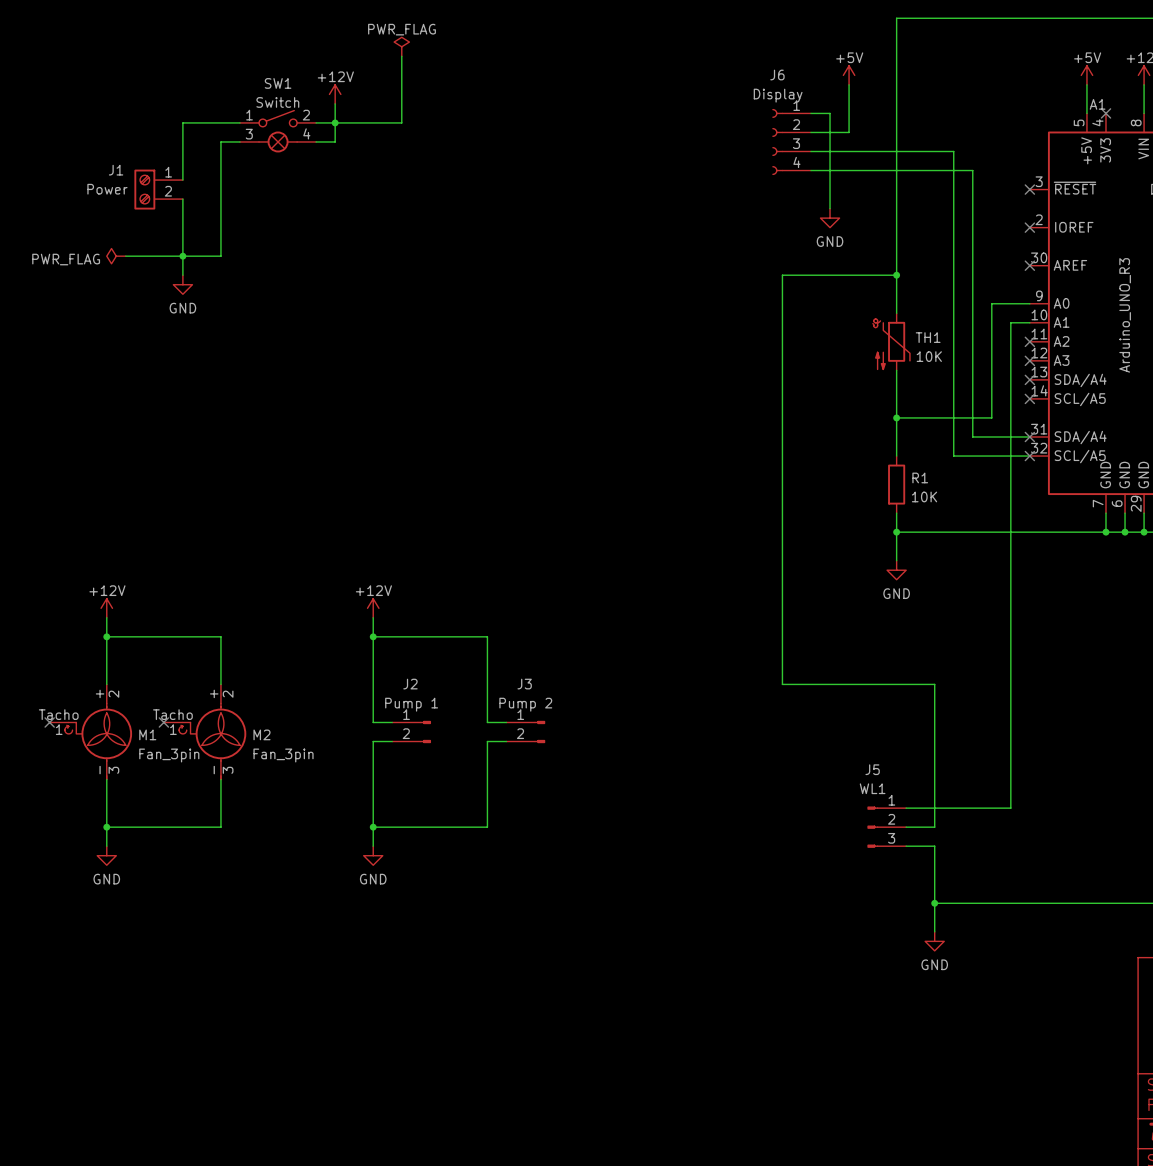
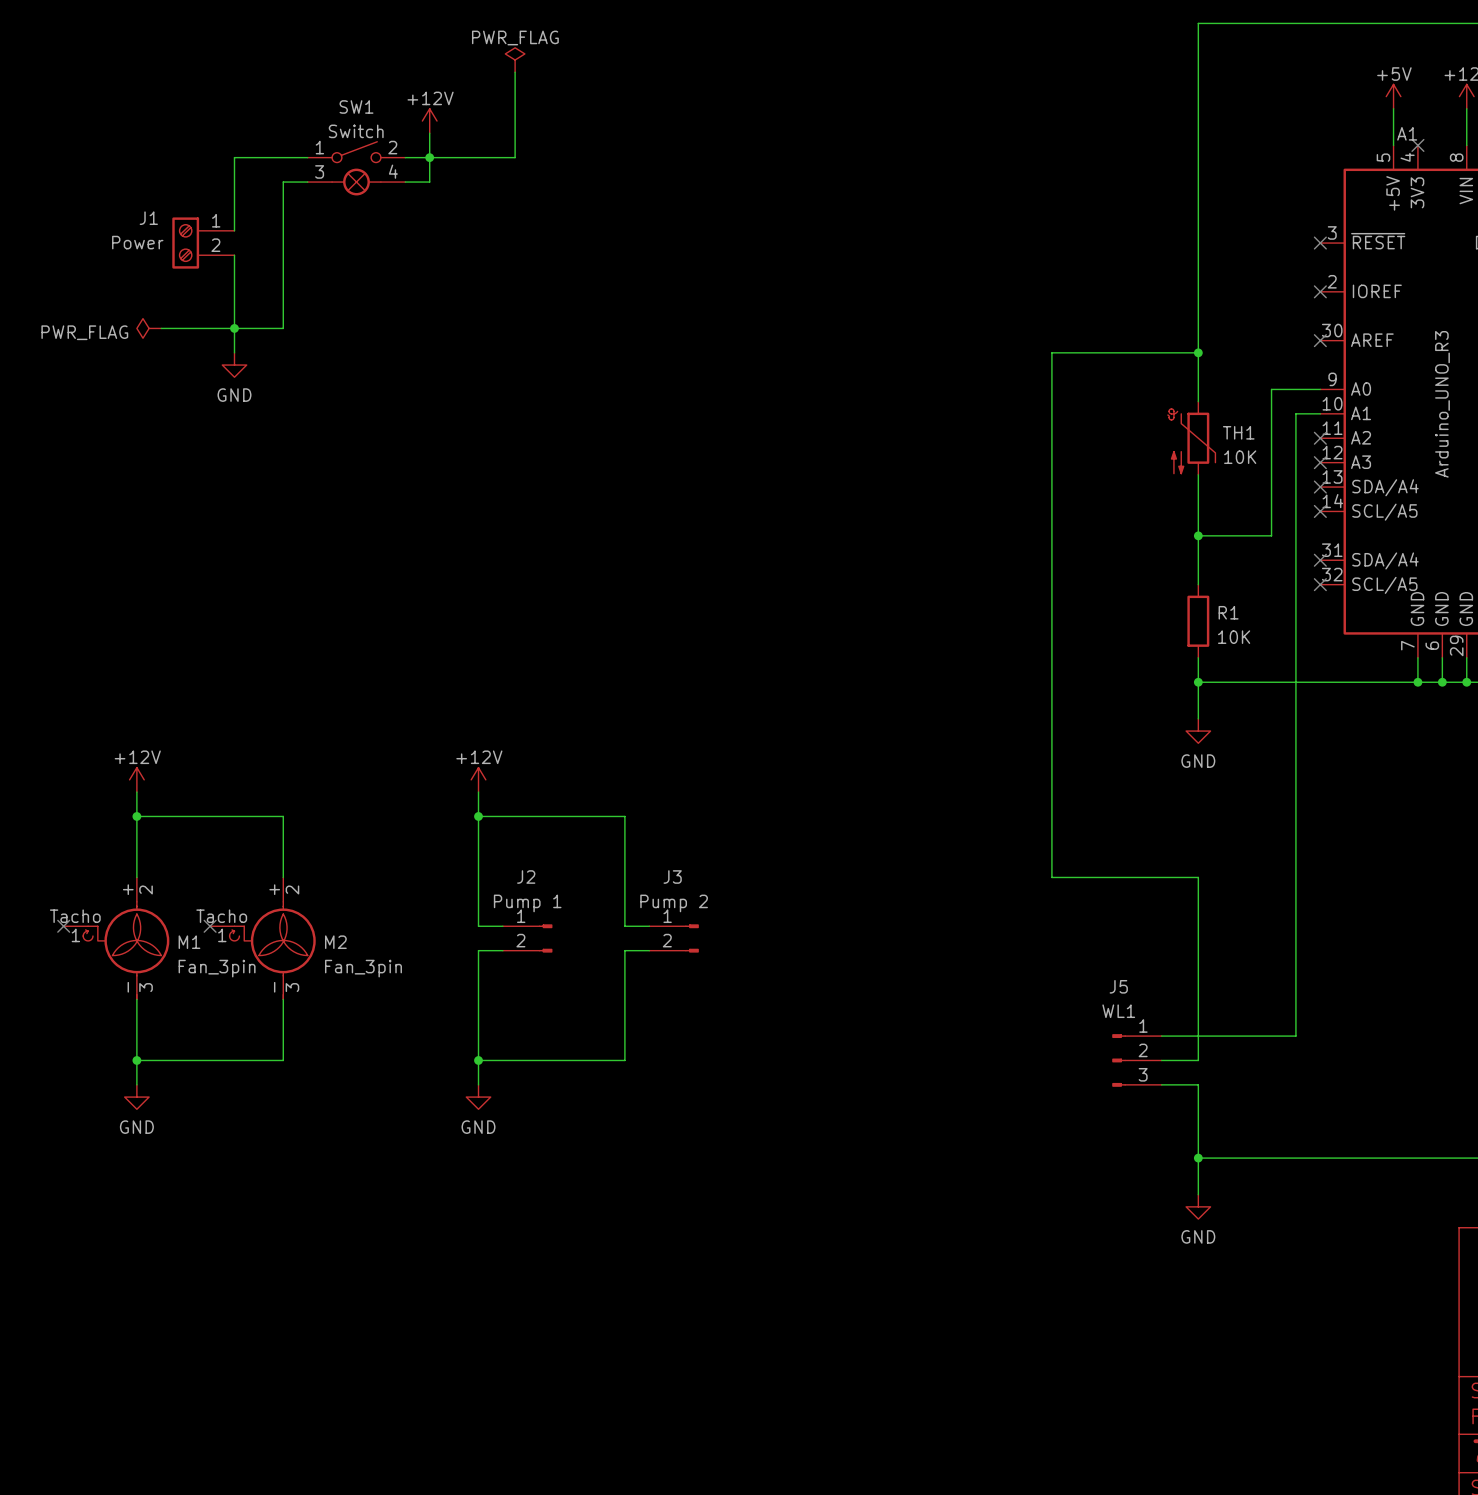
wire: (934, 18) (896, 18) (896, 313) -> (1198, 23) (1198, 401)
power symbol: +5V (849, 75) -> none
wire: (849, 84) (849, 132) (810, 132) -> none
wire: (810, 113) (830, 113) (830, 208) -> none
J6: Display (791, 141) -> none
wire: (810, 151) (953, 151) (953, 456) (1029, 456) -> none
wire: (810, 170) (972, 170) (972, 436) (1029, 436) -> none
power symbol: GND (830, 218) -> none
wire: (820, 275) (782, 275) (782, 684) (820, 684) -> (1051, 352) (1051, 877)
junction position: (896, 275) -> (1198, 352)
TH1 position: (891, 341) -> (1191, 438)
wire: (896, 370) (896, 456) -> (1198, 474) (1198, 584)
wire: (896, 417) (934, 417) -> (1149, 352) (1198, 352)
junction position: (896, 417) -> (1198, 535)
R1 position: (896, 484) -> (1198, 621)
wire: (896, 513) (896, 560) -> (1198, 657) (1198, 718)
wire: (896, 532) (934, 532) -> none
junction position: (896, 532) -> (1198, 682)
power symbol position: GND (896, 570) -> GND (1198, 731)

